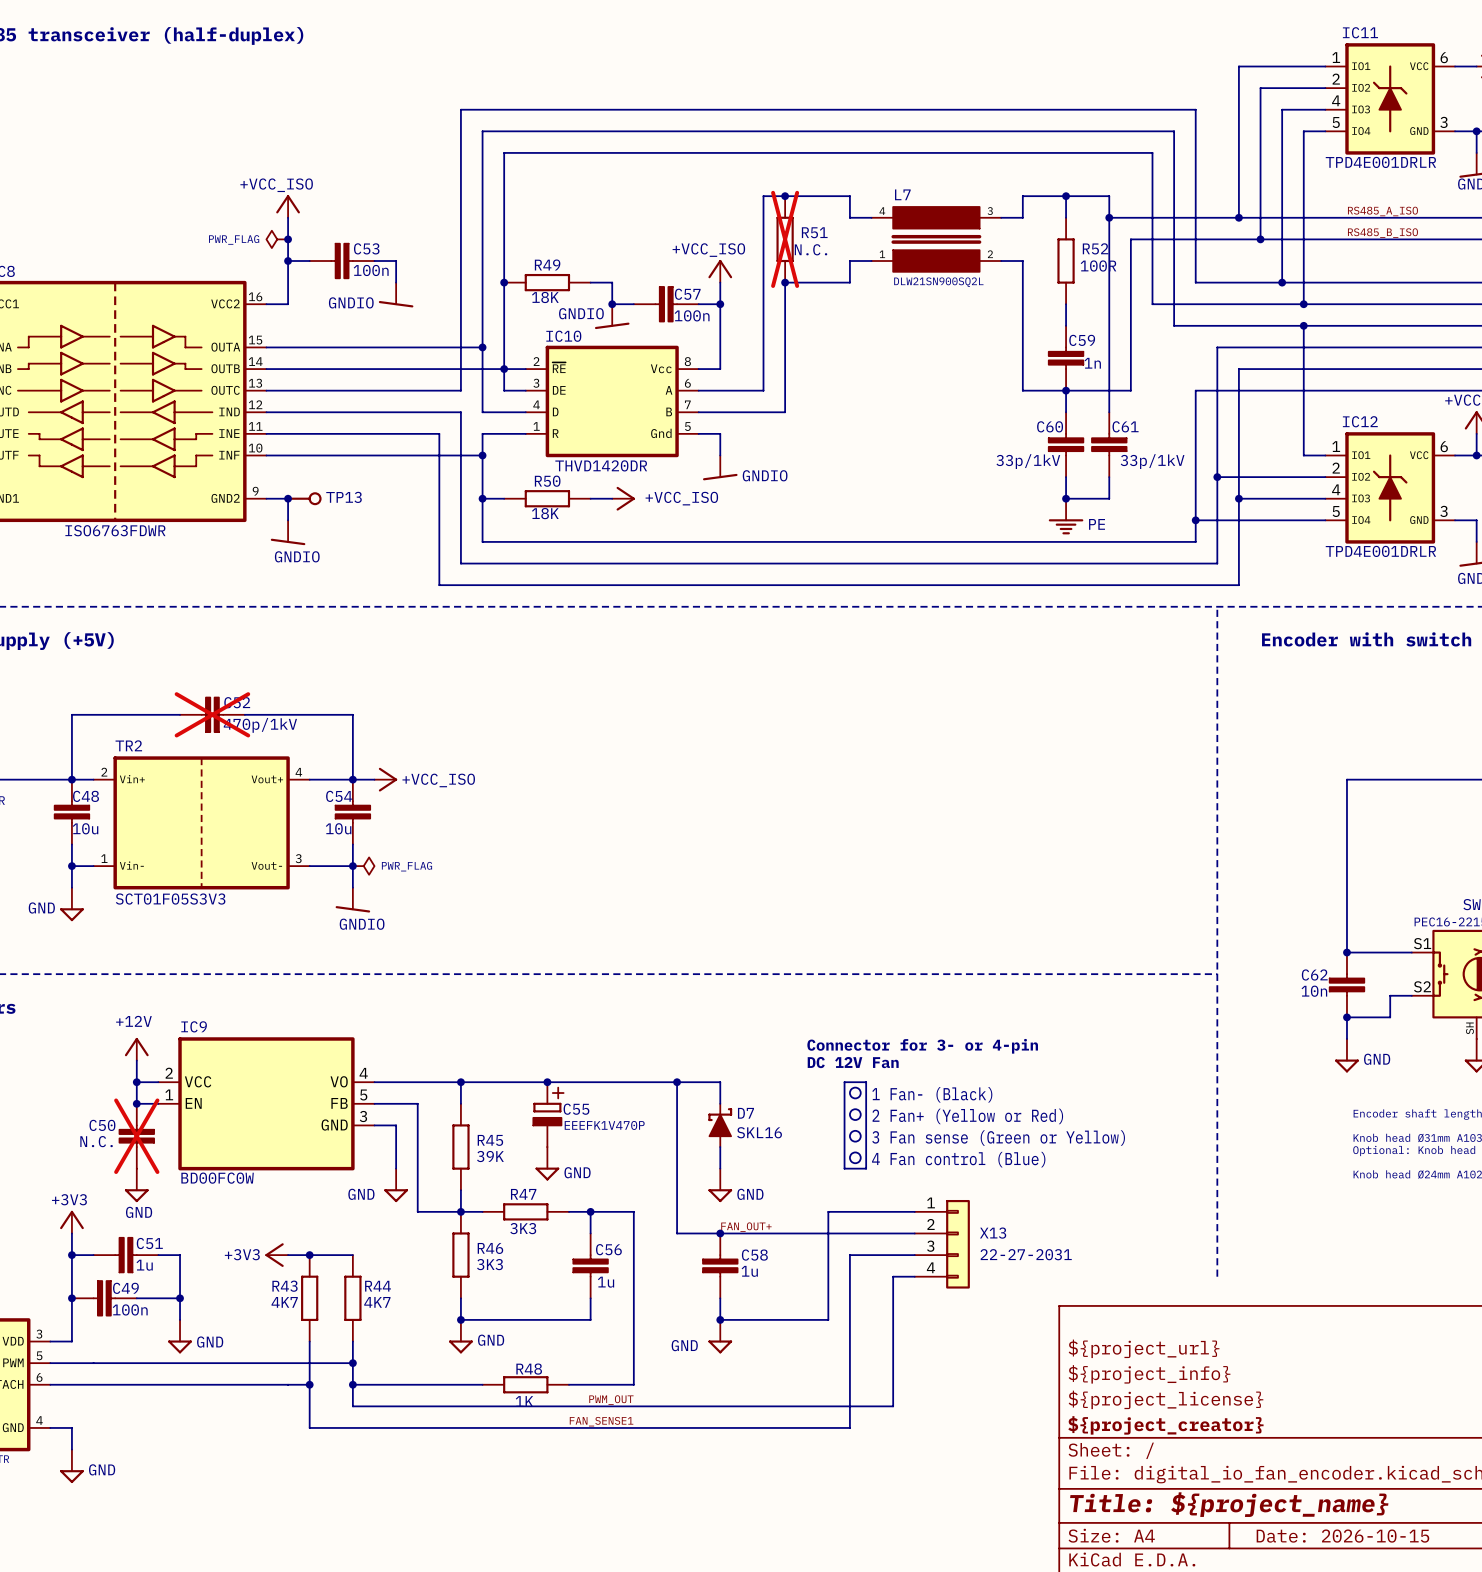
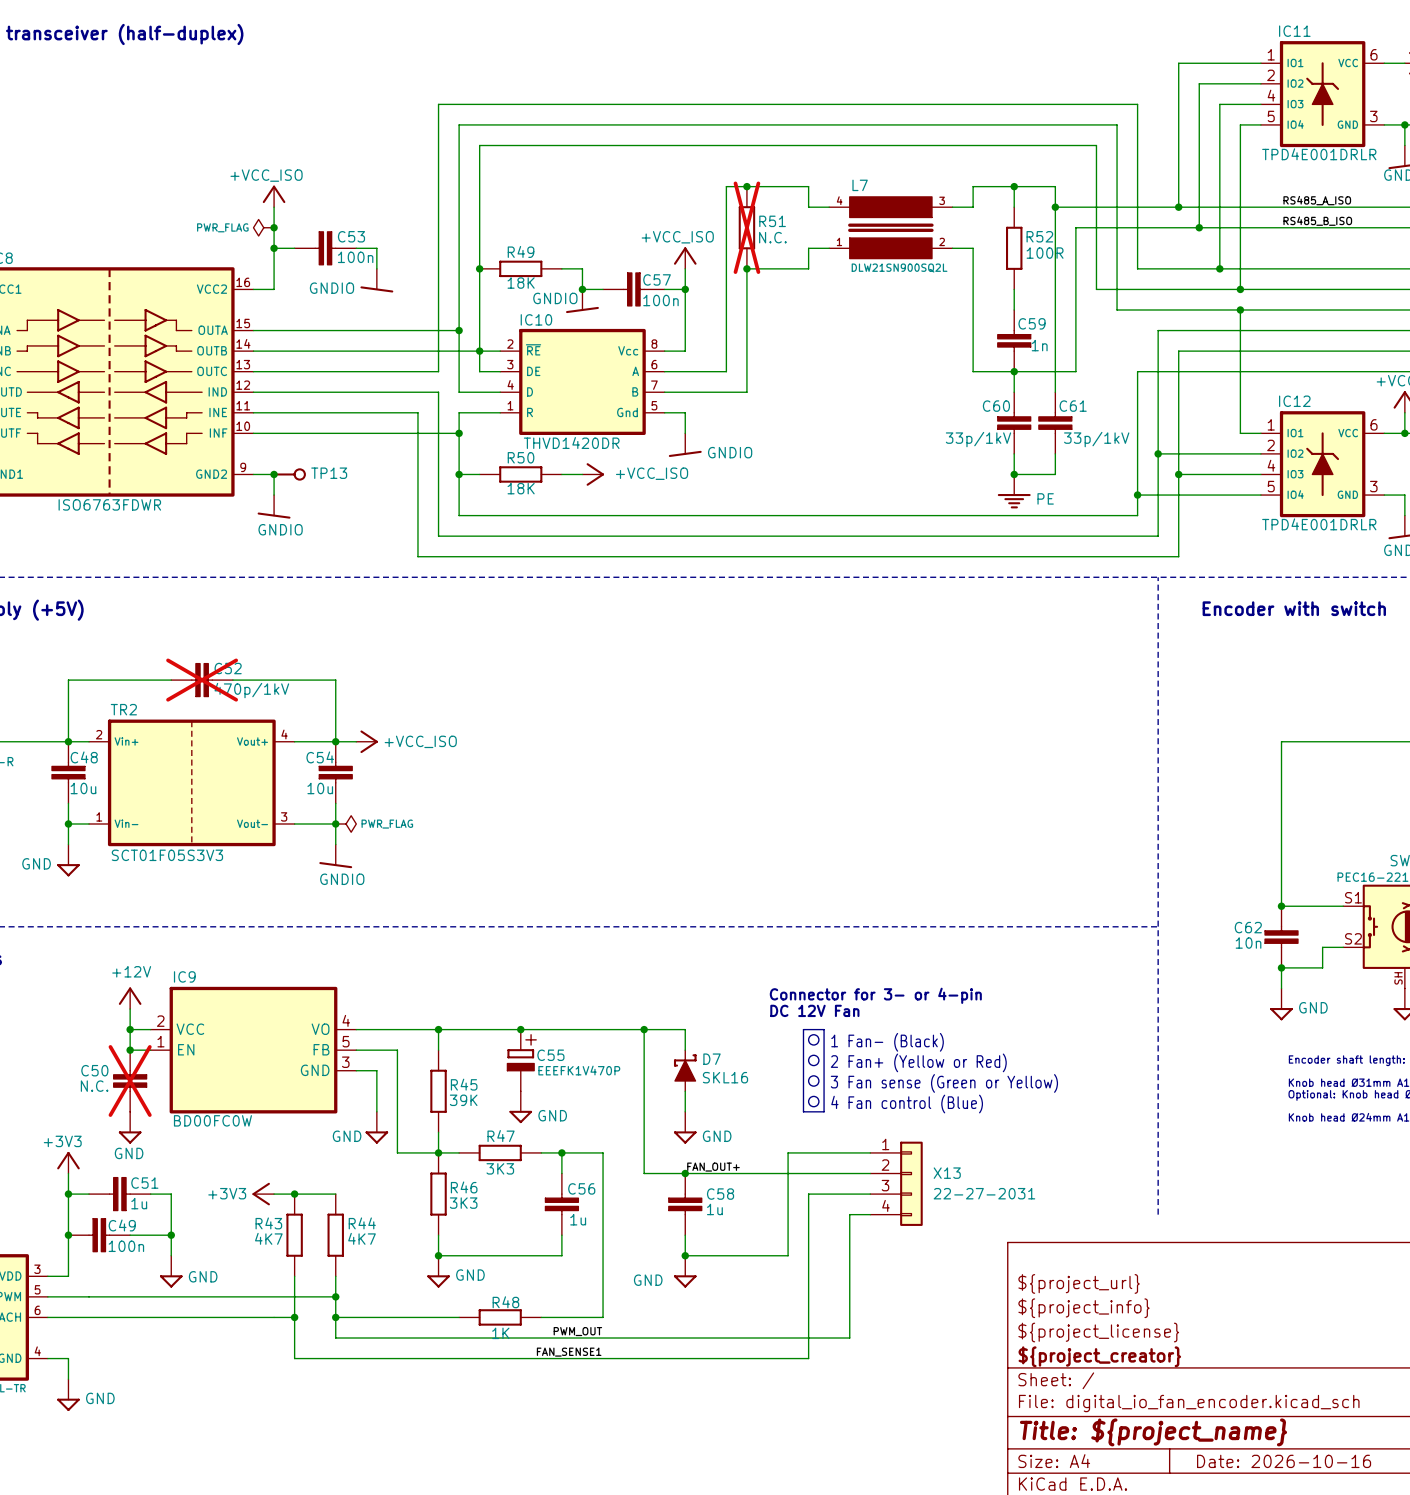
title block: Date: 2026-10-15 (1342, 1536) -> Date: 2026-10-16 (1284, 1461)

